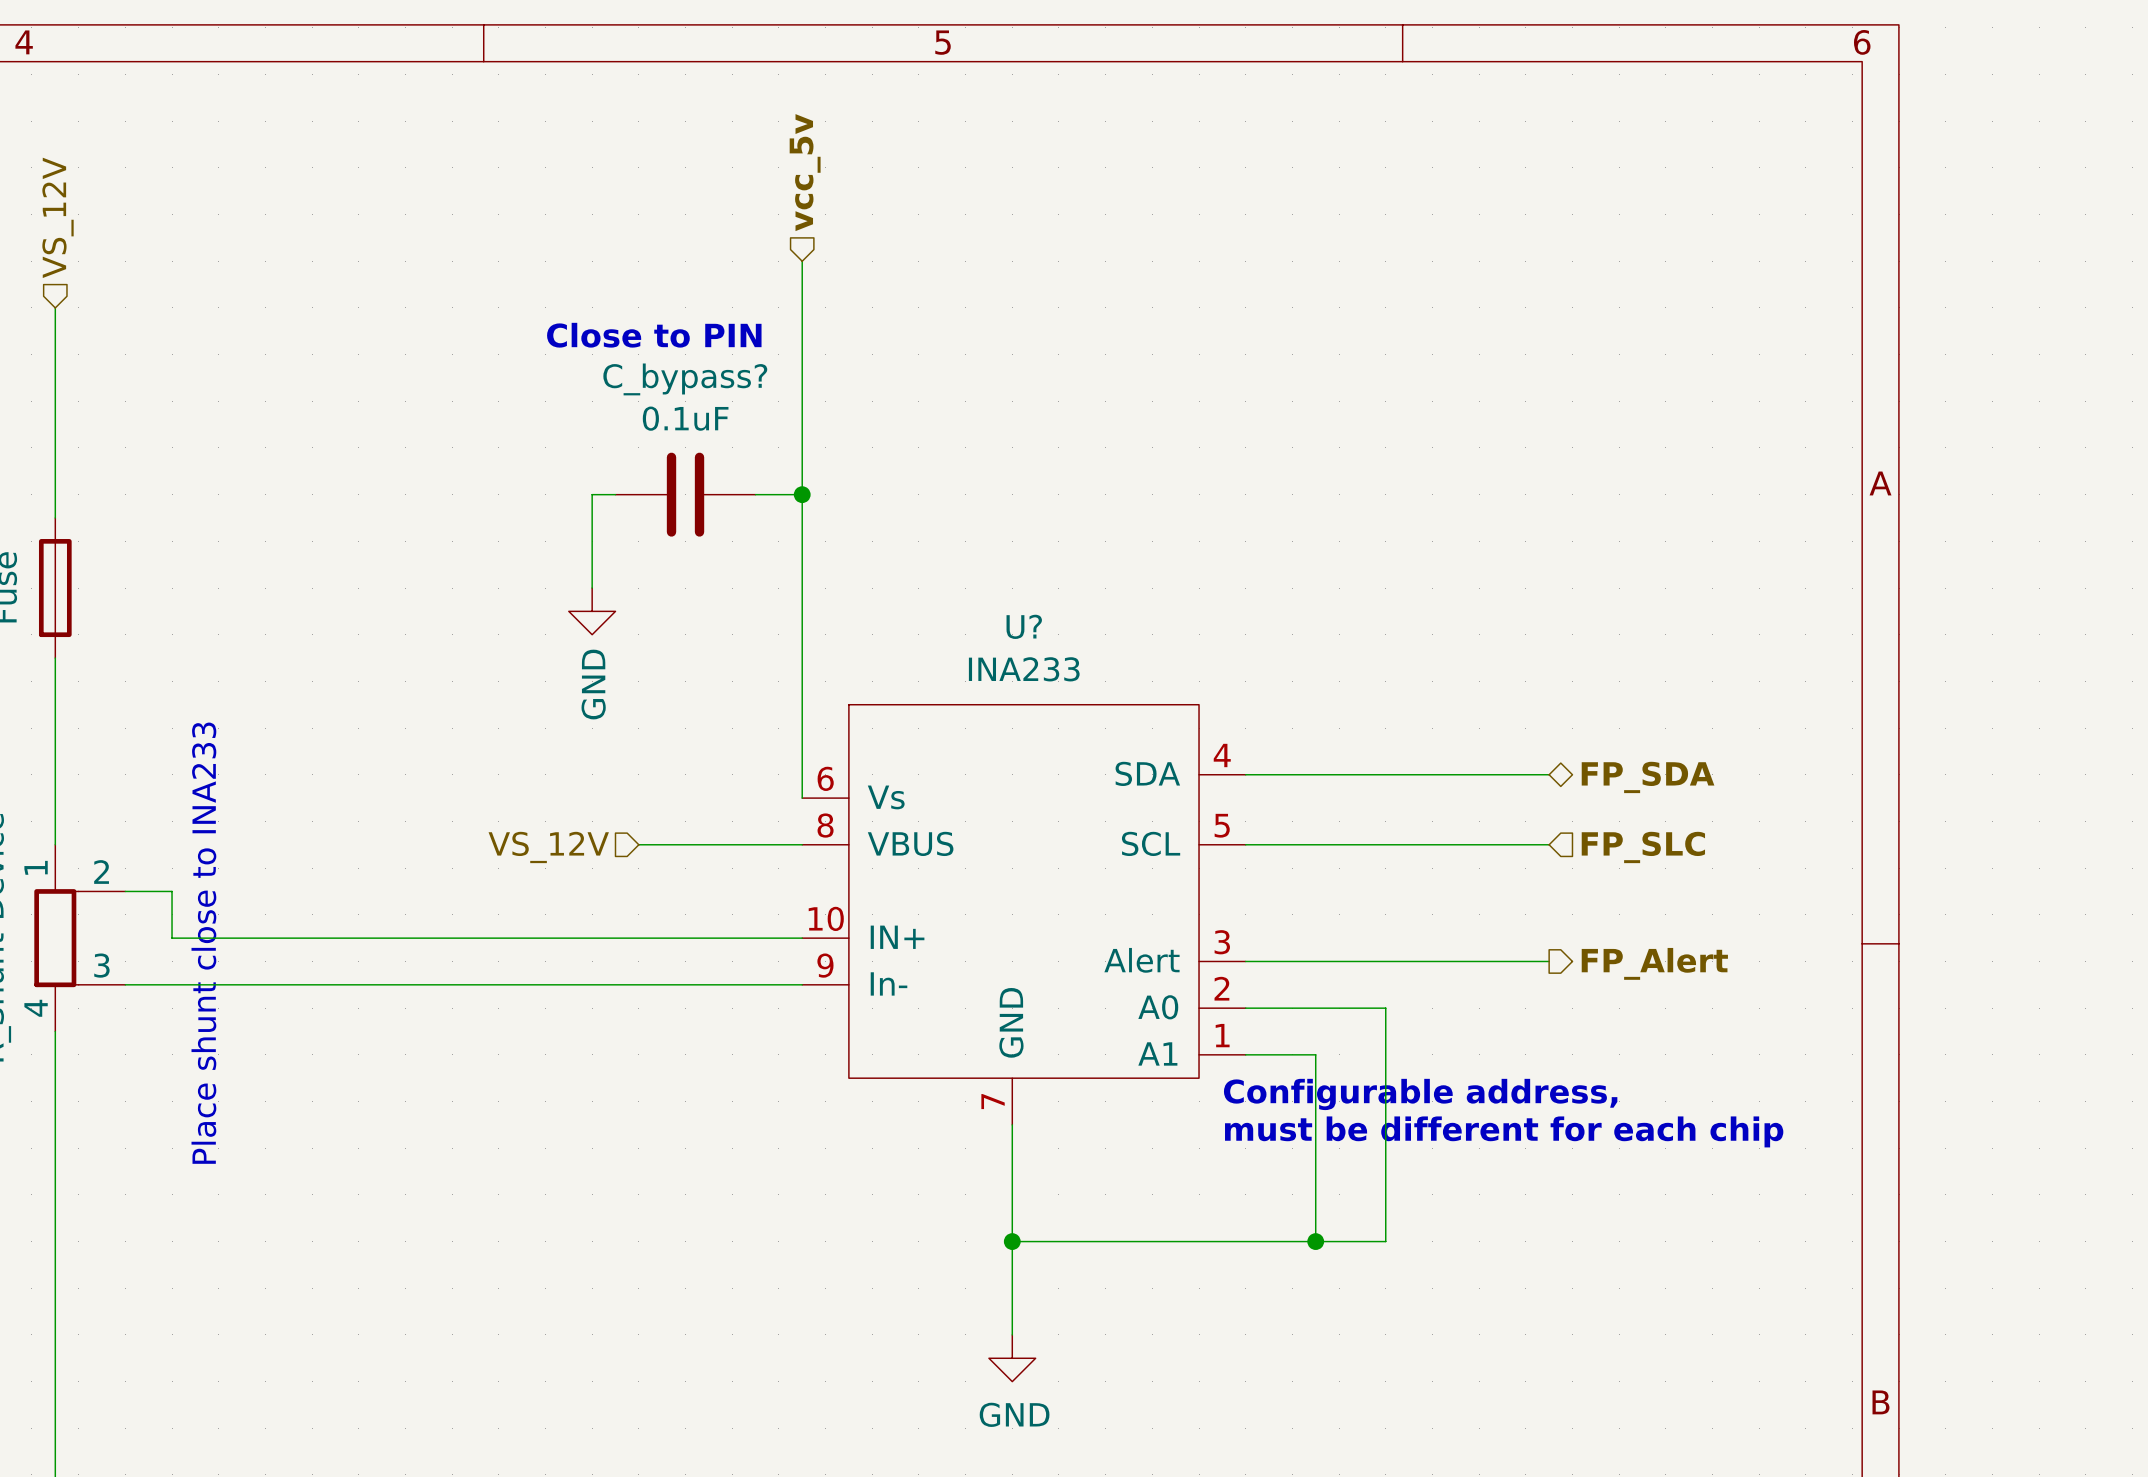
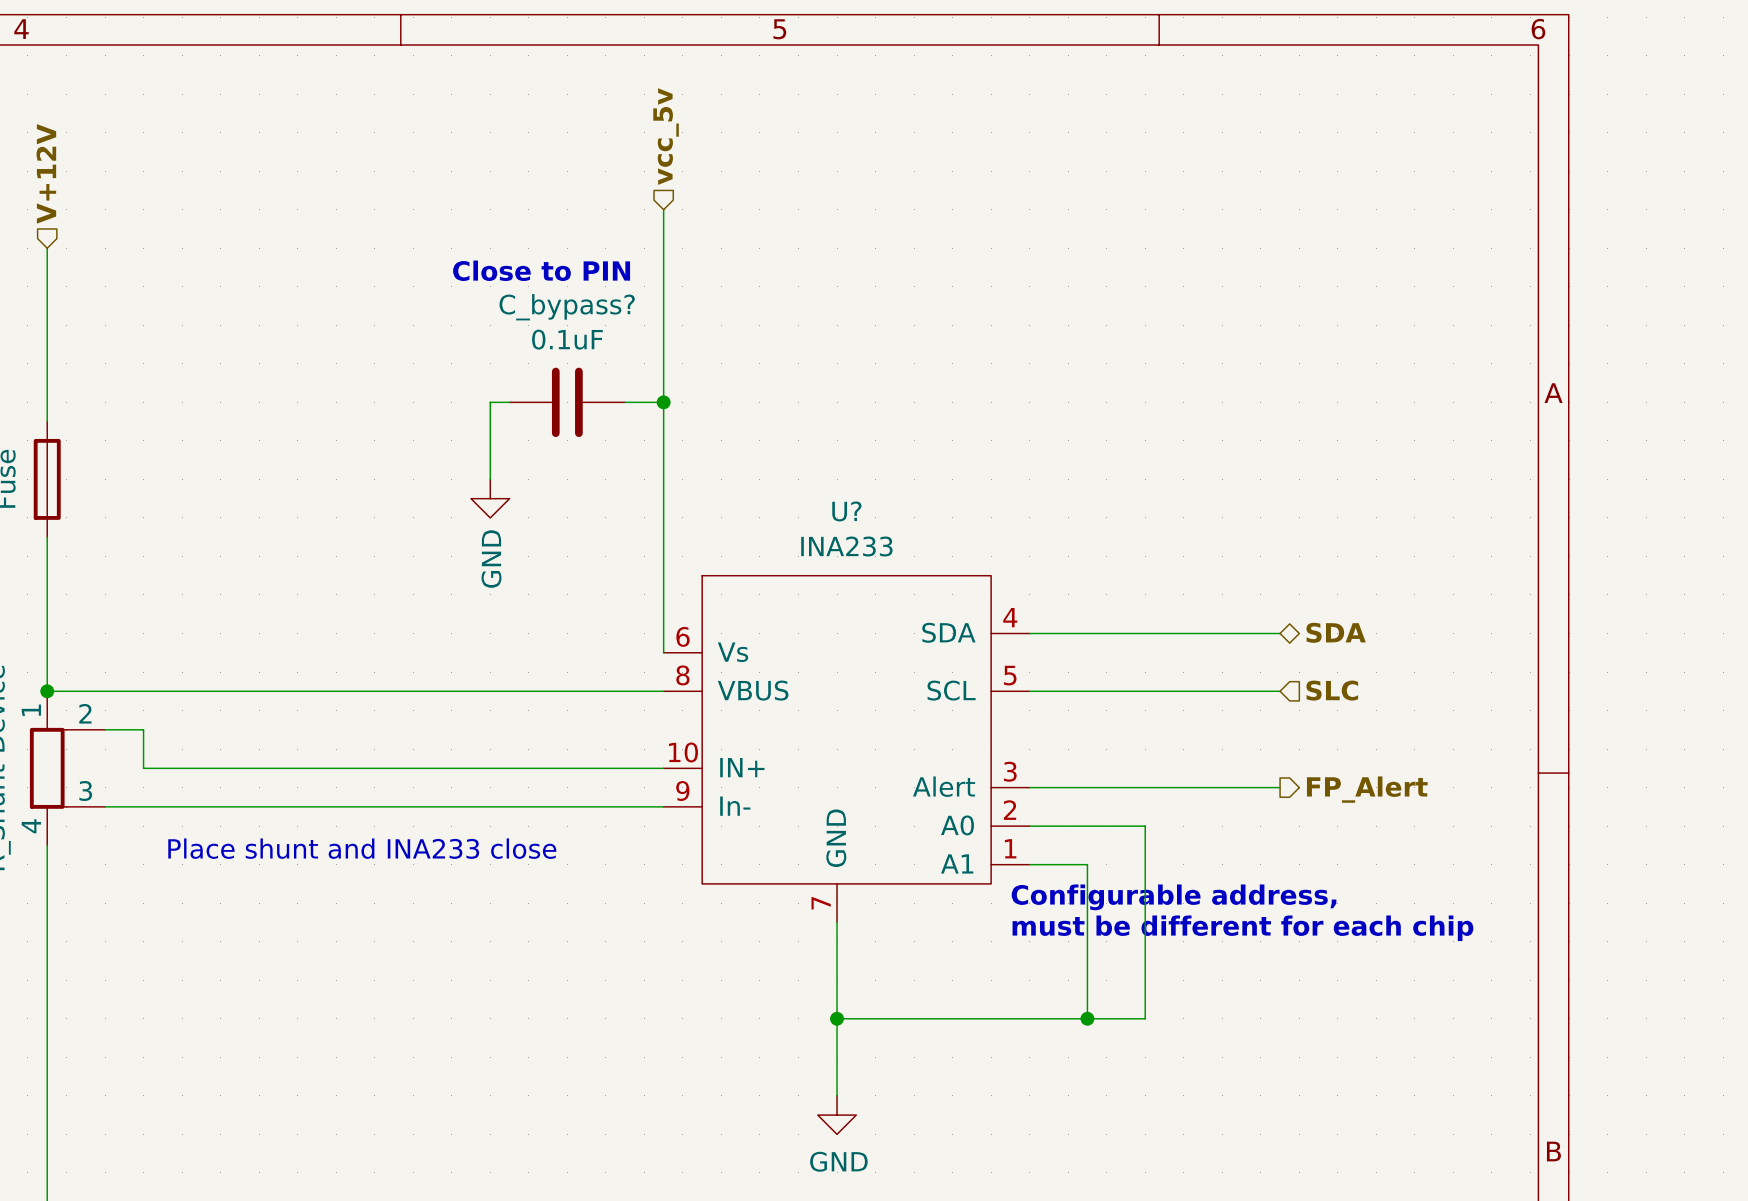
hierarchical label: VS_12V (58, 217) -> V+12V (46, 173)
hierarchical label: FP_SDA (1648, 777) -> SDA (1336, 632)
wire: none -> (47, 691) (528, 691)
junction: none -> (47, 691)
hierarchical label: VS_12V (548, 847) -> none
hierarchical label: FP_SLC (1643, 847) -> SLC (1332, 690)
text: Place shunt close to INA233 (203, 943) -> none
text: none -> Place shunt and INA233 close (362, 848)

